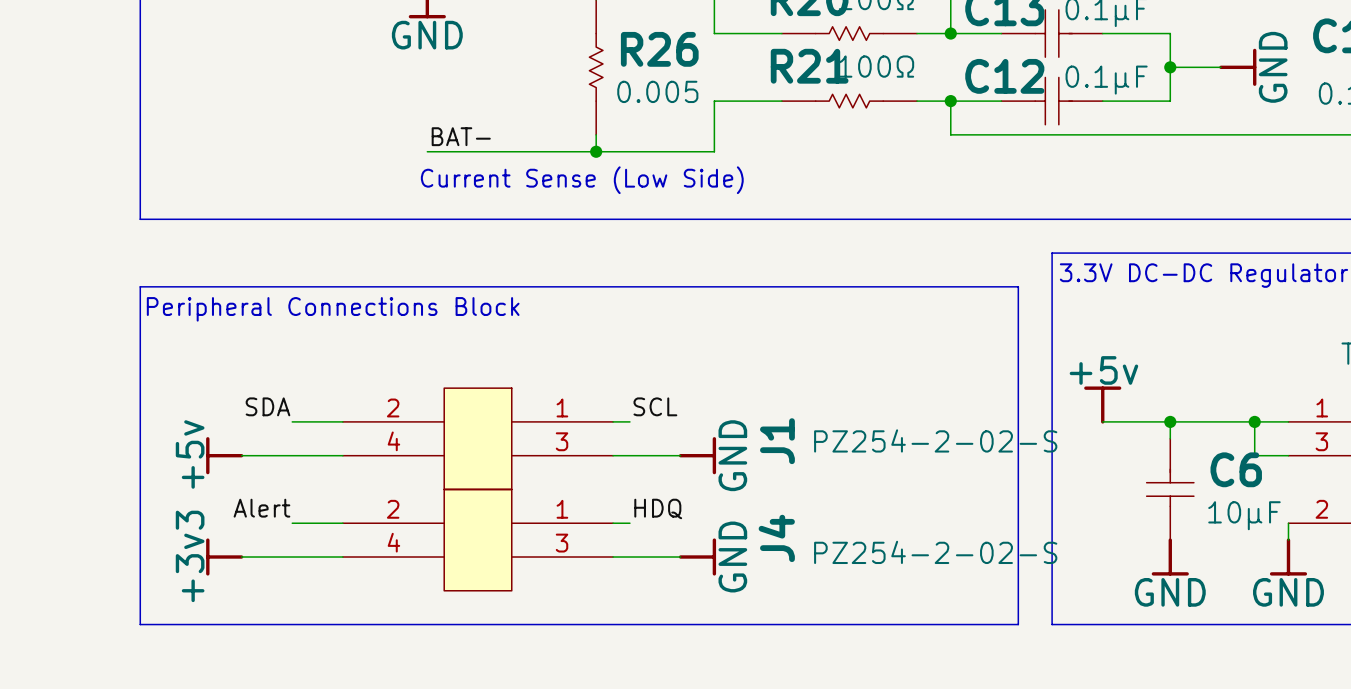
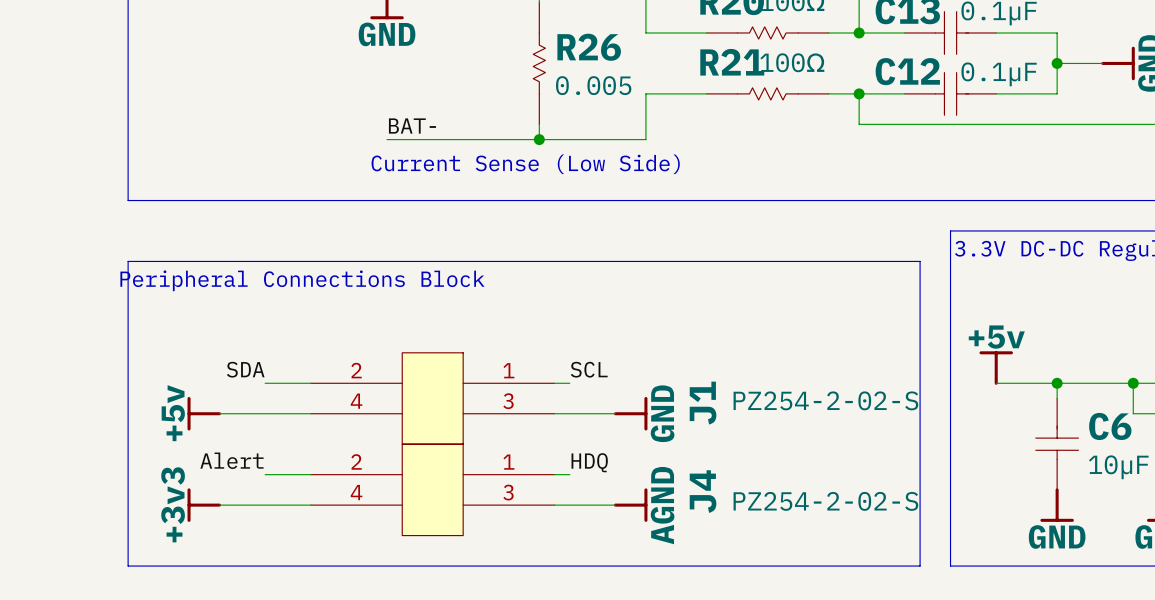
power symbol: GND (697, 557) -> AGND (630, 505)

